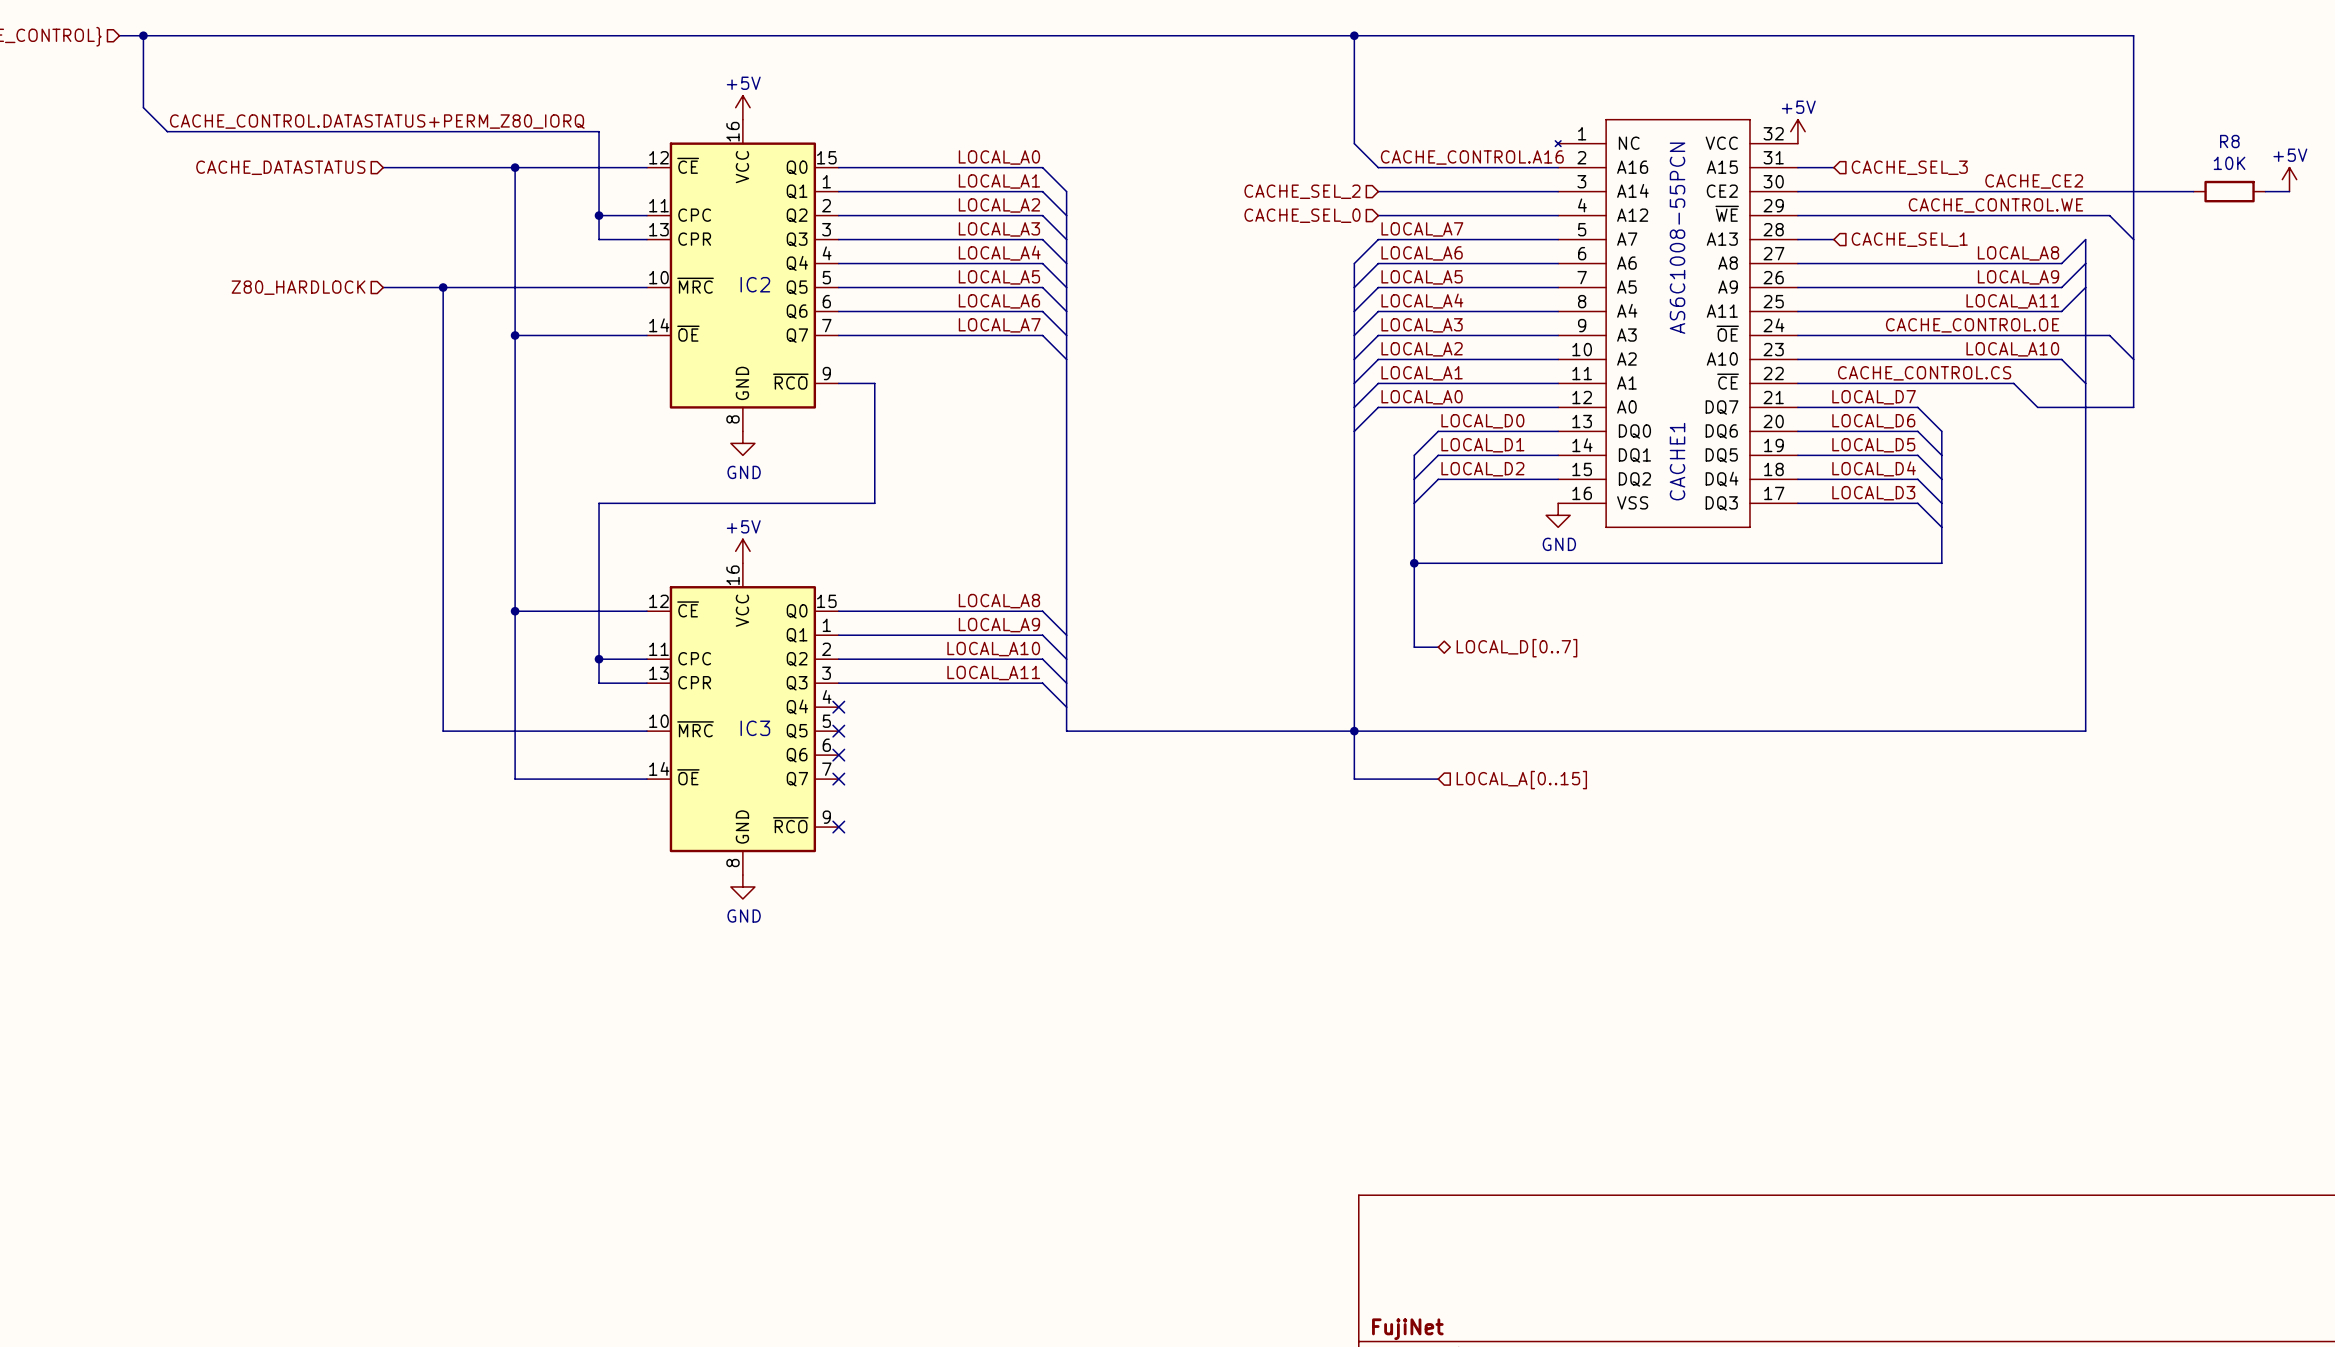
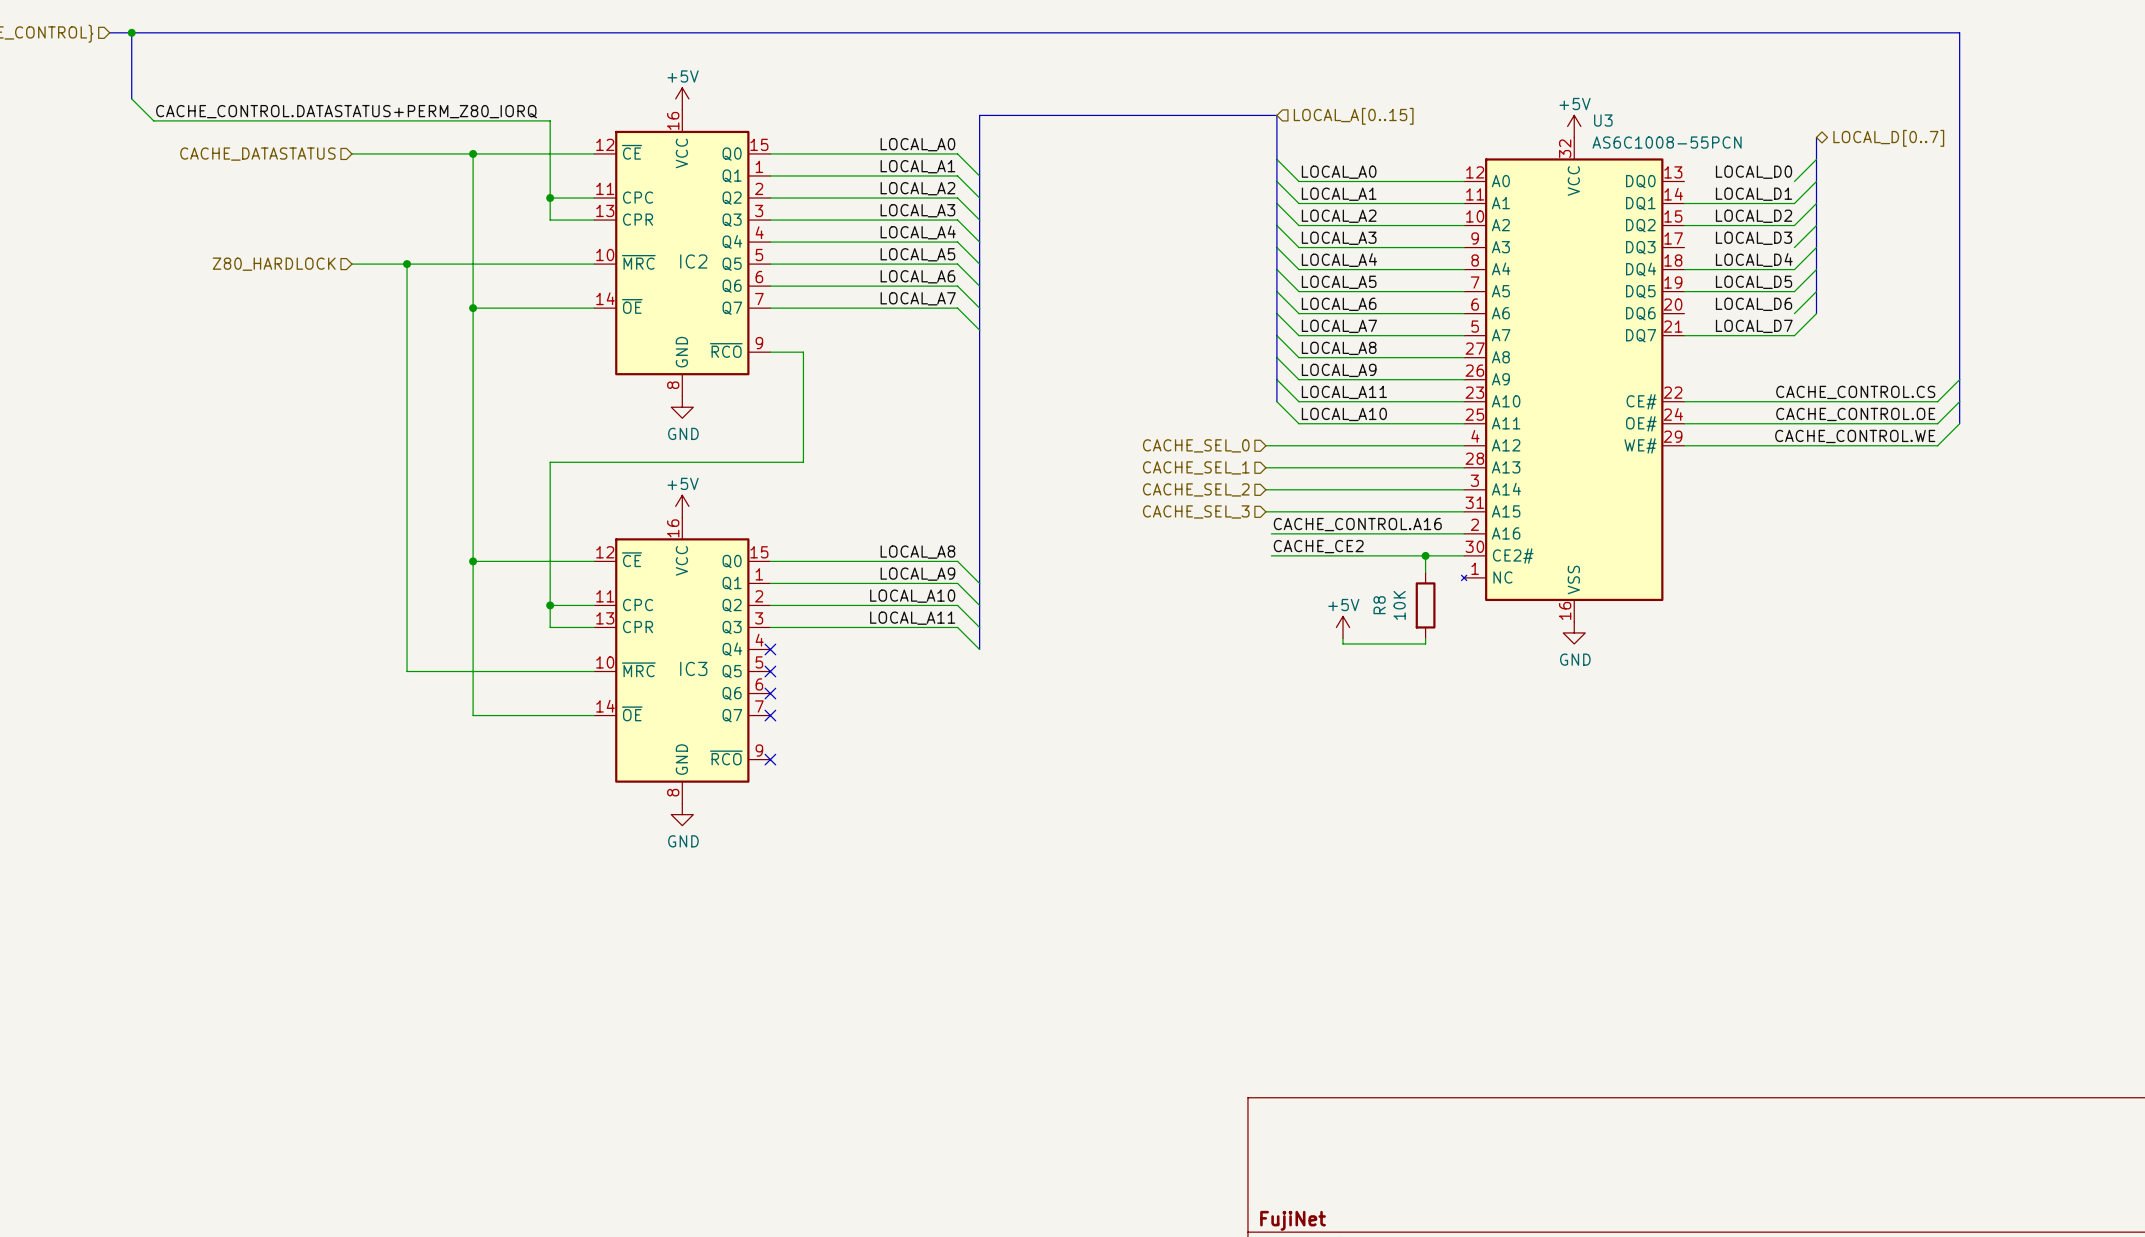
bus: (1354, 35) (1354, 143) -> none
junction: (1354, 35) -> none
hierarchical label: none -> LOCAL_A[0..15] (1353, 116)
power symbol position: +5V (1797, 131) -> +5V (1574, 126)
R8 name position: R8 (2229, 141) -> R8 (1379, 605)
wire: (1354, 143) (1378, 167) (1558, 167) -> (1276, 181) (1298, 203) (1464, 203)
bus: none -> (1816, 137) (1816, 313)
hierarchical label: none -> LOCAL_D[0..7] (1888, 138)
label: CACHE_CONTROL.A16 (1472, 157) -> none
R8 value position: 10K (2229, 163) -> 10K (1399, 605)
wire: (1797, 167) (1833, 167) -> none
hierarchical label: CACHE_SEL_3 (1909, 167) -> none
wire: none -> (1276, 159) (1298, 181)
wire: none -> (1816, 159) (1794, 181)
power symbol: +5V (2289, 179) -> none
label: CACHE_CE2 (2034, 181) -> none
label: none -> LOCAL_D0 (1754, 172)
bus: none -> (979, 175) (979, 115) (1276, 115) (1276, 401)
hierarchical label: CACHE_SEL_2 (1302, 191) -> none
wire: (1378, 191) (1558, 191) -> (1298, 313) (1464, 313)
wire: (1797, 191) (2193, 191) -> none
R8 rotation: 0° (2229, 191) -> 90° clockwise (1425, 605)
R8 position: (2229, 191) -> (1425, 605)
wire: (2265, 191) (2289, 191) -> none
wire: none -> (1298, 181) (1464, 181)
wire: none -> (1816, 181) (1794, 203) (1684, 203)
label: CACHE_CONTROL.WE (1995, 205) -> none
label: none -> LOCAL_D1 (1754, 194)
hierarchical label: CACHE_SEL_0 (1302, 215) -> none
wire: (1378, 215) (1558, 215) -> (1298, 247) (1464, 247)
wire: (1797, 215) (2109, 215) (2133, 239) -> none
wire: none -> (1276, 203) (1298, 225) (1464, 225)
wire: none -> (1816, 203) (1794, 225) (1684, 225)
label position: LOCAL_A7 (1422, 229) -> LOCAL_A7 (1339, 326)
label: none -> LOCAL_D2 (1754, 216)
wire: (1558, 239) (1378, 239) (1354, 263) -> none
wire: (1797, 239) (1833, 239) -> none
hierarchical label: CACHE_SEL_1 (1909, 239) -> none
wire: (2085, 239) (2061, 263) (1797, 263) -> none
bus: (2085, 239) (2085, 731) (1066, 731) (1066, 707) -> none
wire: none -> (1276, 225) (1298, 247)
wire: none -> (1816, 225) (1794, 247)
label position: LOCAL_A6 (1422, 253) -> LOCAL_A6 (1339, 304)
label: LOCAL_A8 (2018, 253) -> none
label: none -> LOCAL_D3 (1754, 238)
bus: (1354, 263) (1354, 779) (1438, 779) -> none
wire: (1558, 263) (1378, 263) (1354, 287) -> none
wire: (2085, 263) (2061, 287) (1797, 287) -> none
wire: none -> (1276, 247) (1298, 269) (1464, 269)
wire: none -> (1816, 247) (1794, 269) (1684, 269)
label position: LOCAL_A5 (1422, 277) -> LOCAL_A5 (1339, 282)
label: LOCAL_A9 (2018, 277) -> none
wire: (1558, 287) (1378, 287) (1354, 311) -> none
wire: (2085, 287) (2061, 311) (1797, 311) -> none
wire: none -> (1276, 269) (1298, 291) (1464, 291)
wire: none -> (1816, 269) (1794, 291) (1684, 291)
label position: LOCAL_A4 (1422, 301) -> LOCAL_A4 (1339, 260)
label: LOCAL_A11 (2012, 301) -> none
wire: (1558, 311) (1378, 311) (1354, 335) -> none
wire: none -> (1276, 291) (1298, 313)
wire: none -> (1816, 291) (1794, 313)
CACHE1: AS6C1008-55PCN (1676, 323) -> none
label position: LOCAL_A3 (1422, 325) -> LOCAL_A3 (1339, 238)
label position: CACHE_CONTROL.OE (1972, 325) -> CACHE_CONTROL.OE (1855, 414)
wire: (1558, 335) (1378, 335) (1354, 359) -> none
wire: (1797, 335) (2109, 335) (2133, 359) -> none
wire: none -> (1276, 313) (1298, 335) (1464, 335)
wire: none -> (1816, 313) (1794, 335) (1684, 335)
label position: LOCAL_A2 (1422, 349) -> LOCAL_A2 (1339, 216)
label: LOCAL_A10 (2012, 349) -> none
wire: (1558, 359) (1378, 359) (1354, 383) -> none
wire: (1797, 359) (2061, 359) (2085, 383) -> none
wire: none -> (1276, 335) (1298, 357)
label position: LOCAL_A1 (1422, 373) -> LOCAL_A1 (1339, 194)
label position: CACHE_CONTROL.CS (1924, 373) -> CACHE_CONTROL.CS (1855, 392)
label: none -> LOCAL_A8 (1339, 348)
wire: (1558, 383) (1378, 383) (1354, 407) -> none
wire: (1797, 383) (2013, 383) (2037, 407) -> none
wire: none -> (1276, 357) (1298, 379) (1464, 379)
wire: none -> (1298, 357) (1464, 357)
label position: LOCAL_A0 (1422, 397) -> LOCAL_A0 (1339, 172)
label position: LOCAL_D7 (1874, 397) -> LOCAL_D7 (1754, 326)
label: none -> LOCAL_A9 (1339, 370)
wire: (1558, 407) (1378, 407) (1354, 431) -> none
wire: (1797, 407) (1917, 407) (1941, 431) -> none
bus: (2037, 407) (2133, 407) -> (1959, 423) (1959, 374)
wire: none -> (1276, 379) (1298, 401)
U3: none -> AS6C1008-55PCN (1572, 379)
wire: none -> (1959, 379) (1937, 401) (1684, 401)
label: LOCAL_D0 (1482, 421) -> none
label position: LOCAL_D6 (1873, 421) -> LOCAL_D6 (1754, 304)
label: none -> LOCAL_A11 (1344, 392)
wire: (1558, 431) (1438, 431) (1414, 455) -> none
wire: (1797, 431) (1917, 431) (1941, 455) -> none
bus: (1941, 431) (1941, 563) (1414, 563) -> none
wire: none -> (1276, 401) (1298, 423) (1464, 423)
wire: none -> (1298, 401) (1464, 401)
wire: none -> (1959, 401) (1937, 423) (1684, 423)
label: LOCAL_D1 (1482, 445) -> none
label position: LOCAL_D5 (1873, 445) -> LOCAL_D5 (1754, 282)
label: none -> LOCAL_A10 (1344, 414)
bus: (1414, 455) (1414, 647) (1438, 647) -> none
wire: (1558, 455) (1438, 455) (1414, 479) -> none
wire: (1797, 455) (1917, 455) (1941, 479) -> none
wire: none -> (1959, 423) (1937, 445) (1684, 445)
label position: LOCAL_D4 (1874, 468) -> LOCAL_D4 (1754, 260)
label: LOCAL_D2 (1482, 469) -> none
label: none -> CACHE_CONTROL.WE (1855, 436)
wire: (1558, 479) (1438, 479) (1414, 503) -> none
wire: (1797, 479) (1917, 479) (1941, 503) -> none
hierarchical label: none -> CACHE_SEL_0 (1196, 445)
wire: none -> (1265, 445) (1464, 445)
label: LOCAL_D3 (1873, 493) -> none
wire: (1797, 503) (1917, 503) (1941, 527) -> none
hierarchical label: none -> CACHE_SEL_1 (1196, 467)
wire: none -> (1265, 467) (1464, 467)
power symbol position: GND (1558, 515) -> GND (1574, 632)
hierarchical label: none -> CACHE_SEL_2 (1196, 489)
wire: none -> (1265, 489) (1464, 489)
hierarchical label: none -> CACHE_SEL_3 (1196, 511)
wire: none -> (1265, 511) (1464, 511)
junction: (1414, 563) -> none
label: none -> CACHE_CONTROL.A16 (1357, 524)
wire: none -> (1271, 533) (1464, 533)
label: none -> CACHE_CE2 (1318, 546)
wire: none -> (1271, 555) (1464, 555)
wire: none -> (1425, 555) (1425, 572)
junction: none -> (1425, 555)
hierarchical label: LOCAL_D[0..7] (1516, 648) -> none
power symbol: none -> +5V (1343, 627)
wire: none -> (1343, 638) (1343, 643) (1425, 643) (1425, 638)
junction: (1354, 731) -> none
hierarchical label: LOCAL_A[0..15] (1521, 780) -> none

